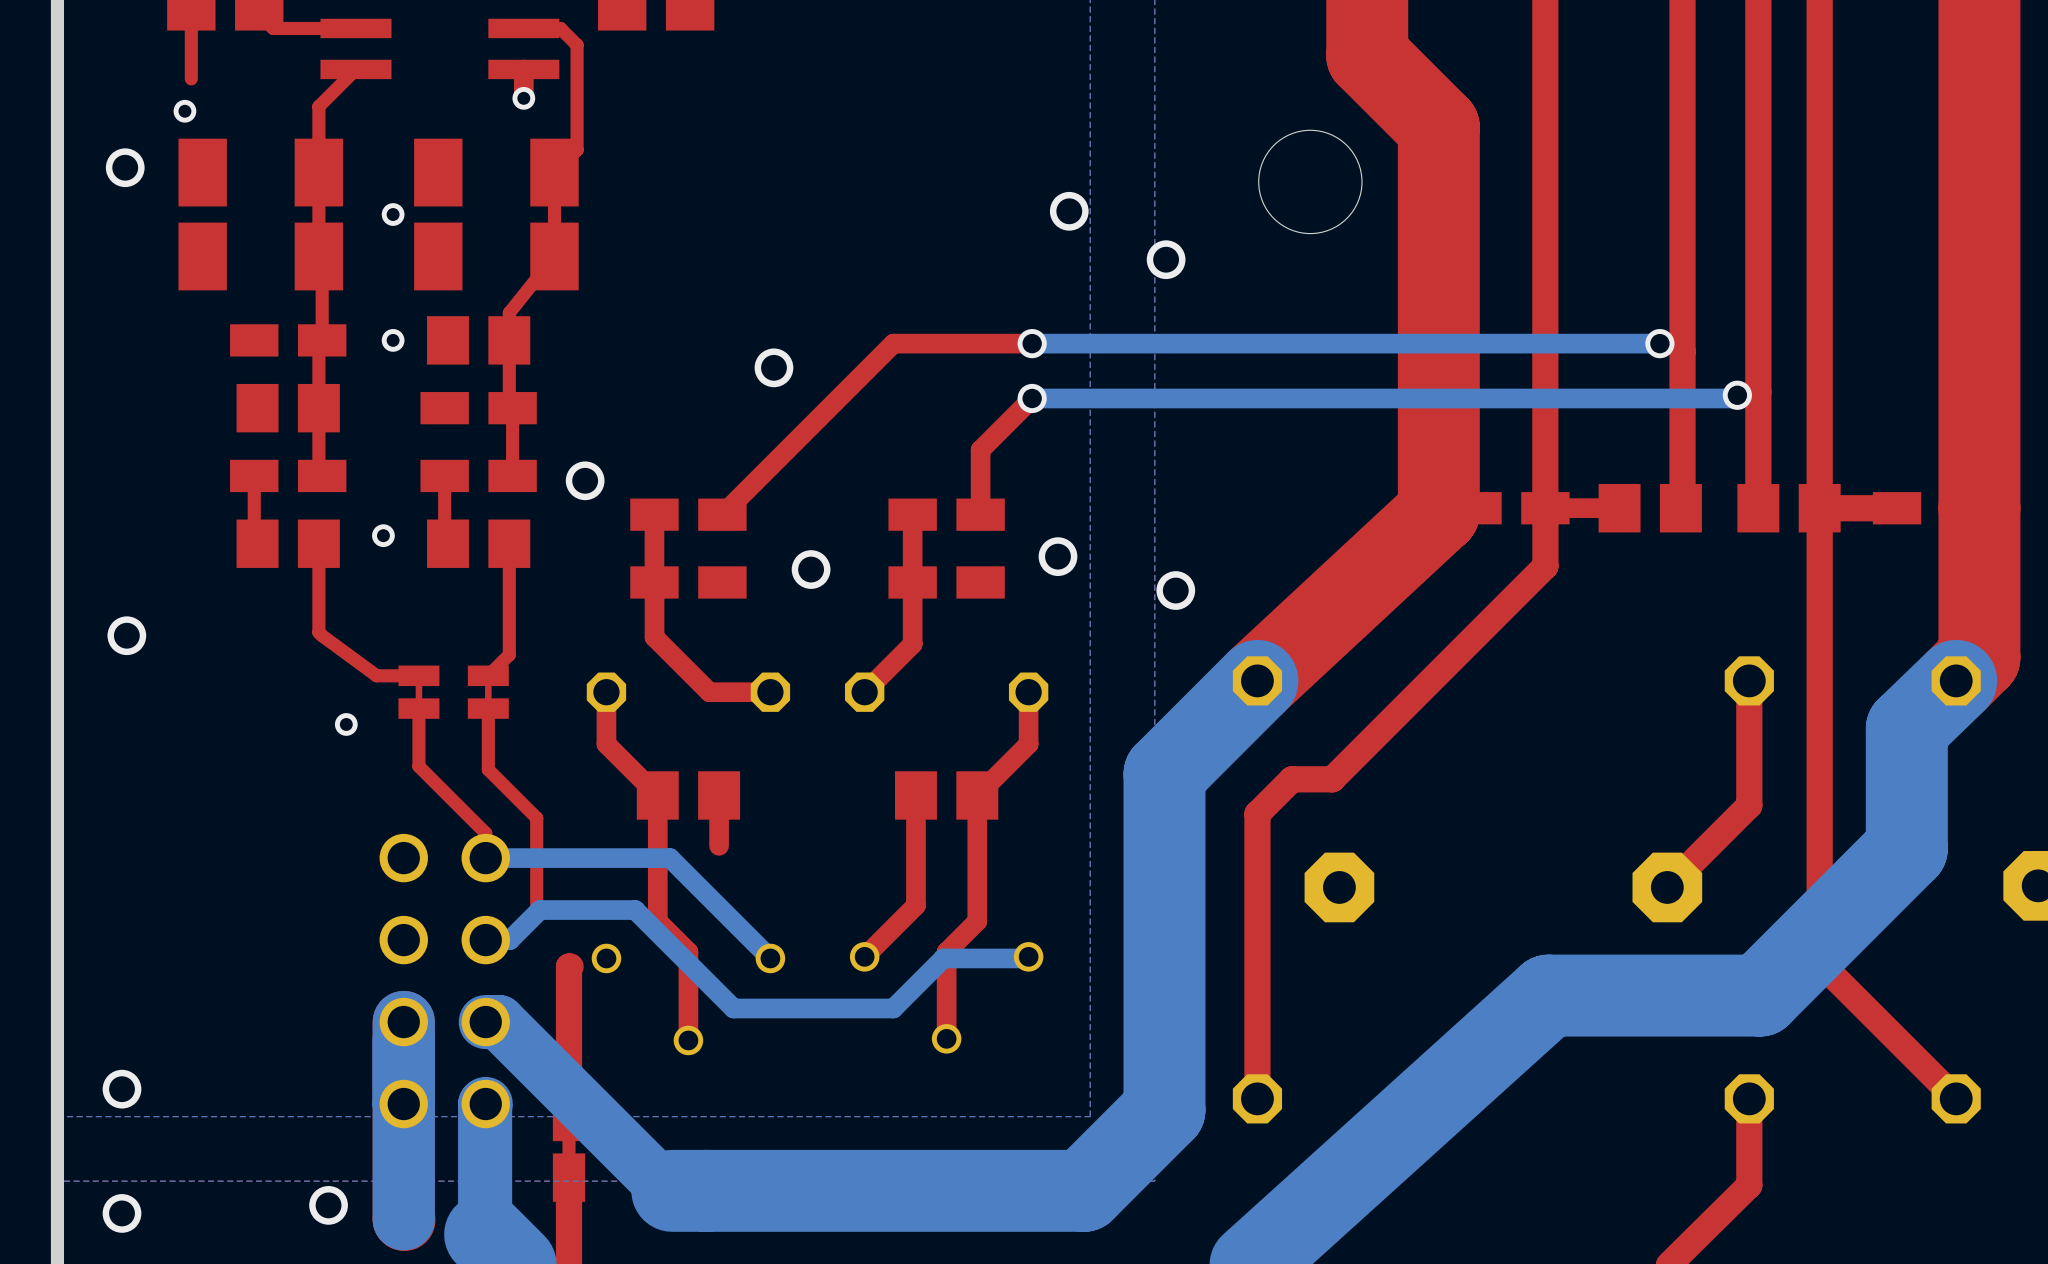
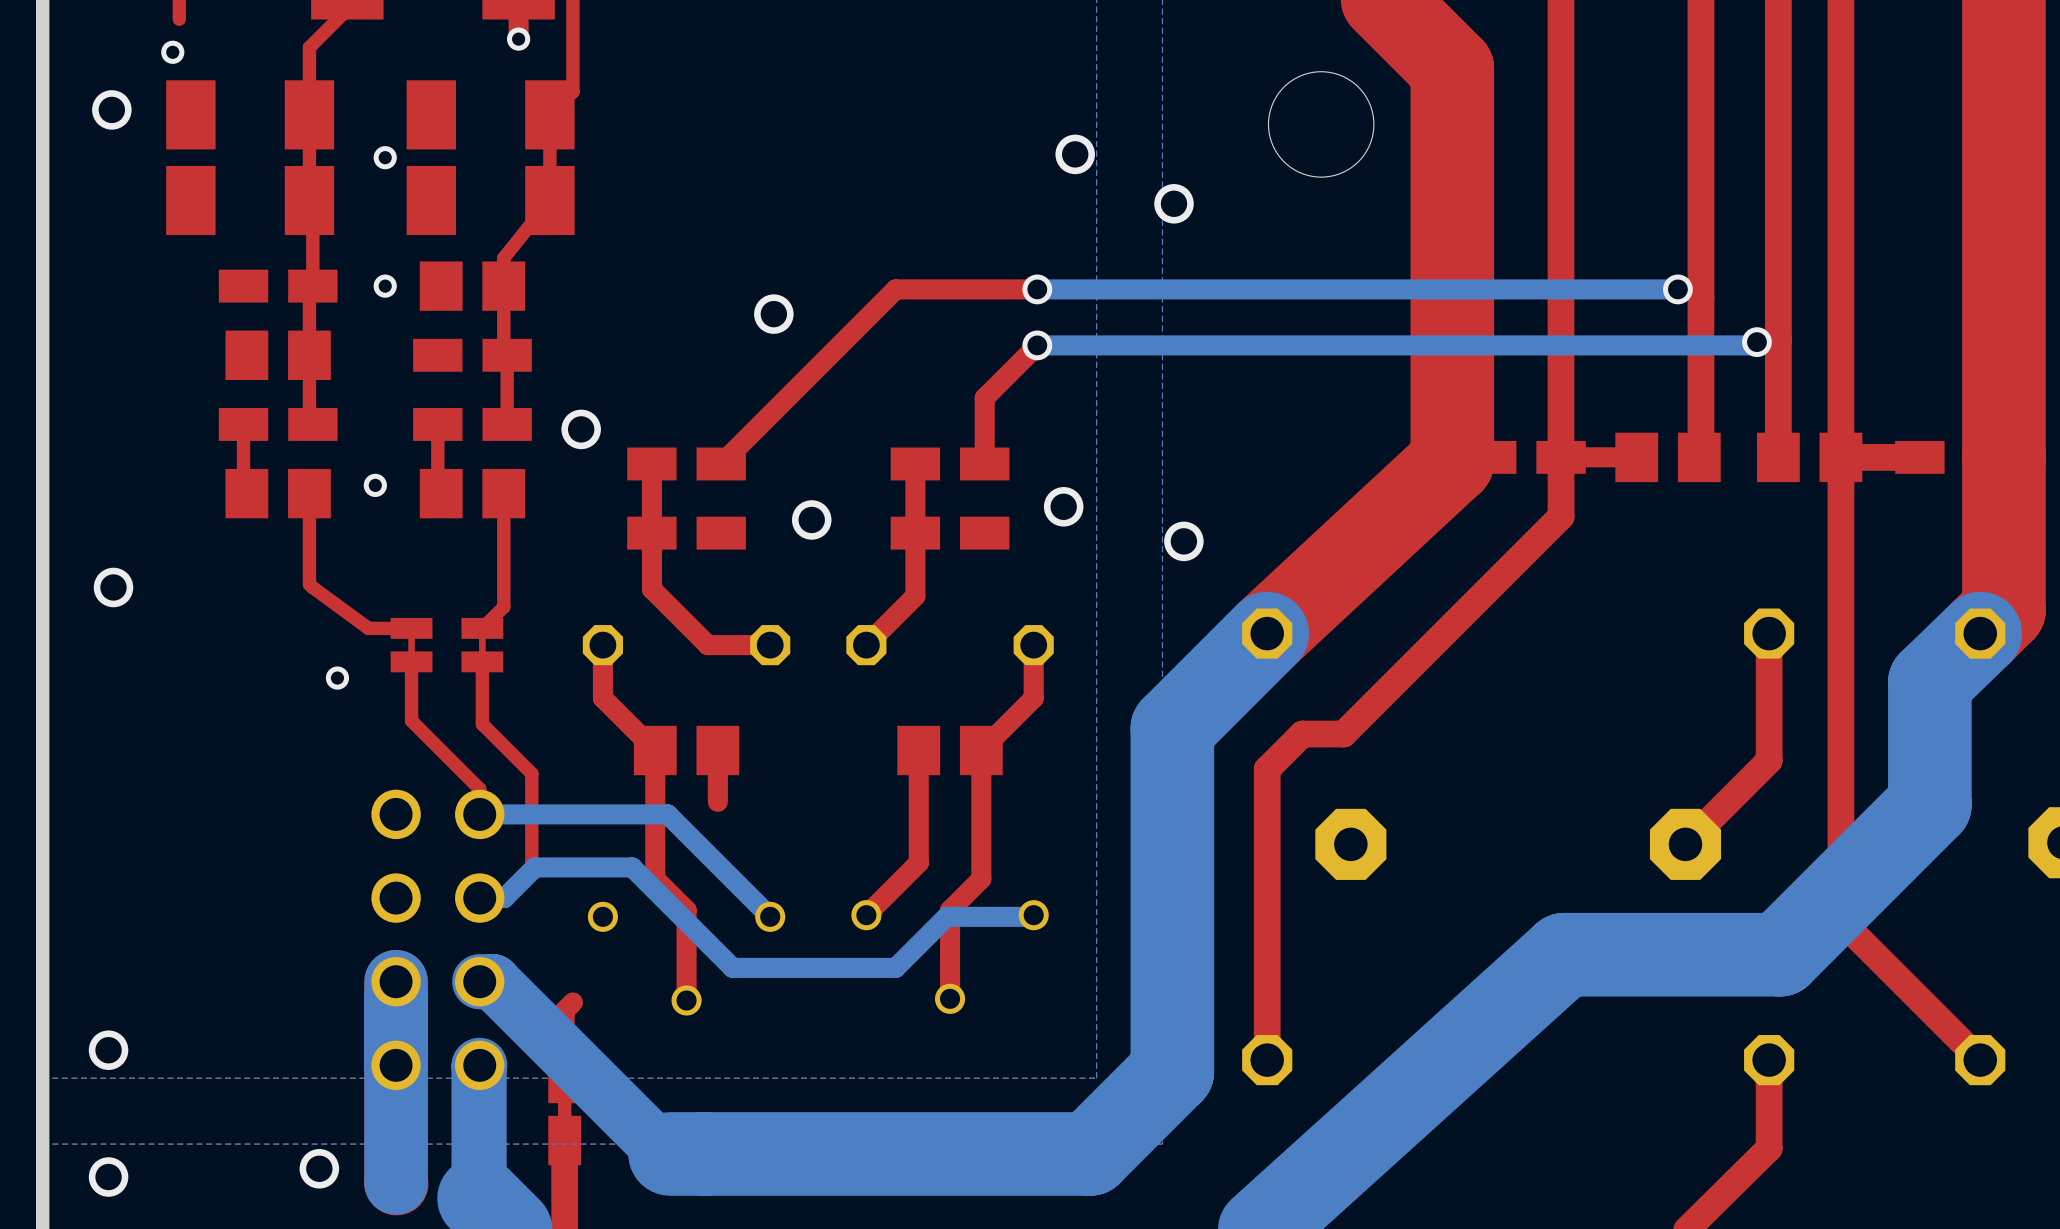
top track: (570, 966) (569, 966) (569, 1050) -> (572, 1002) (564, 1010)

